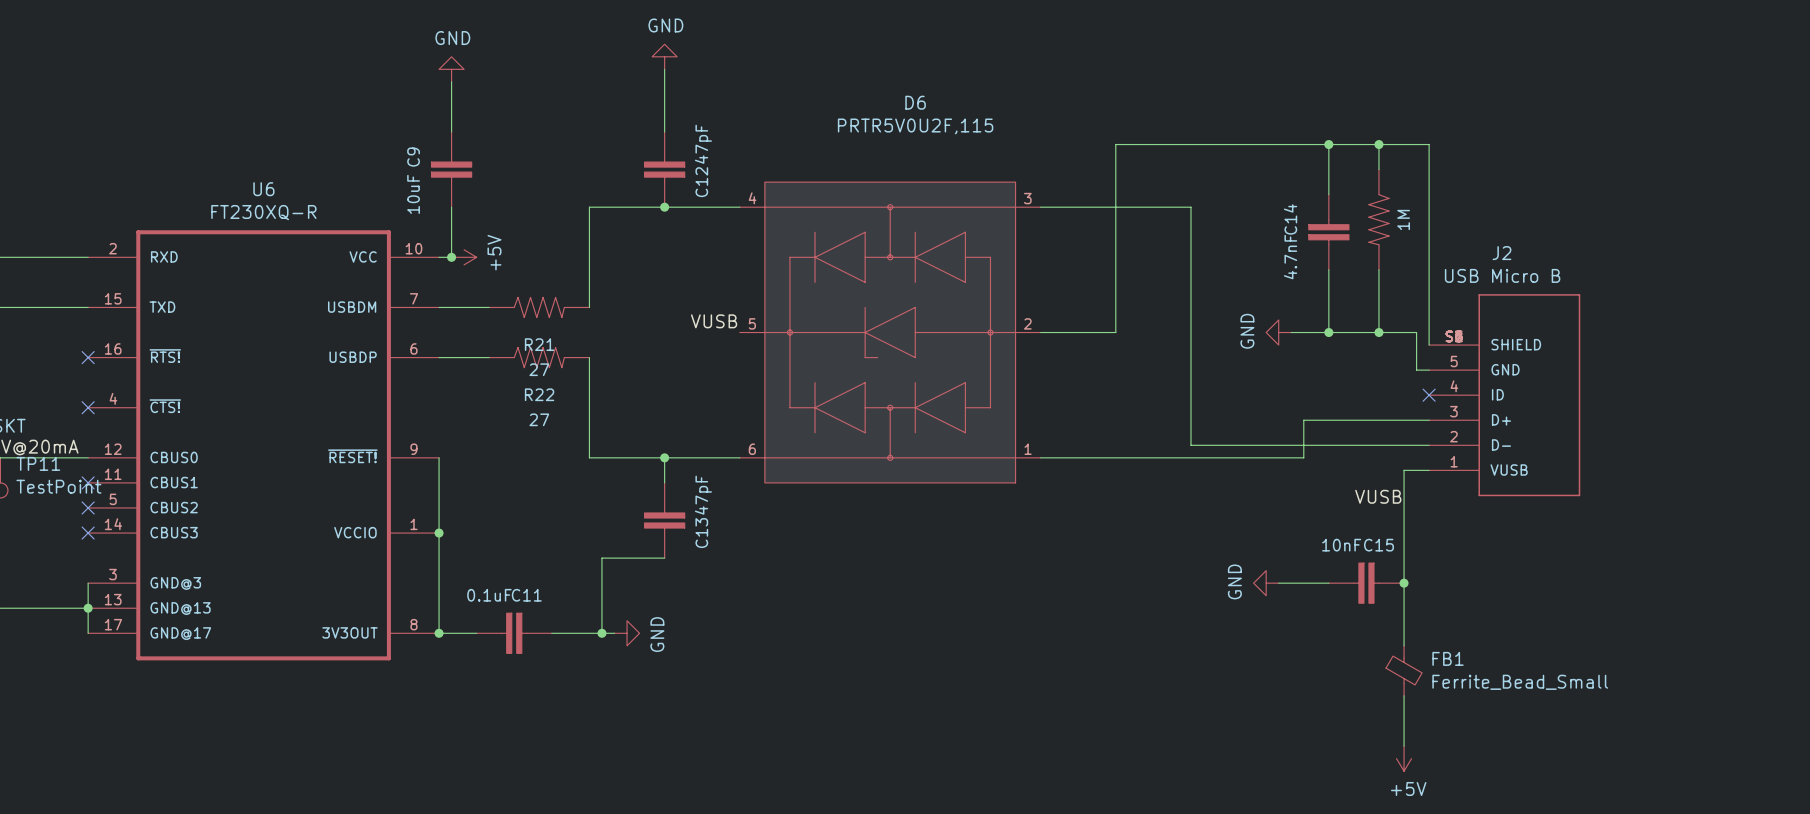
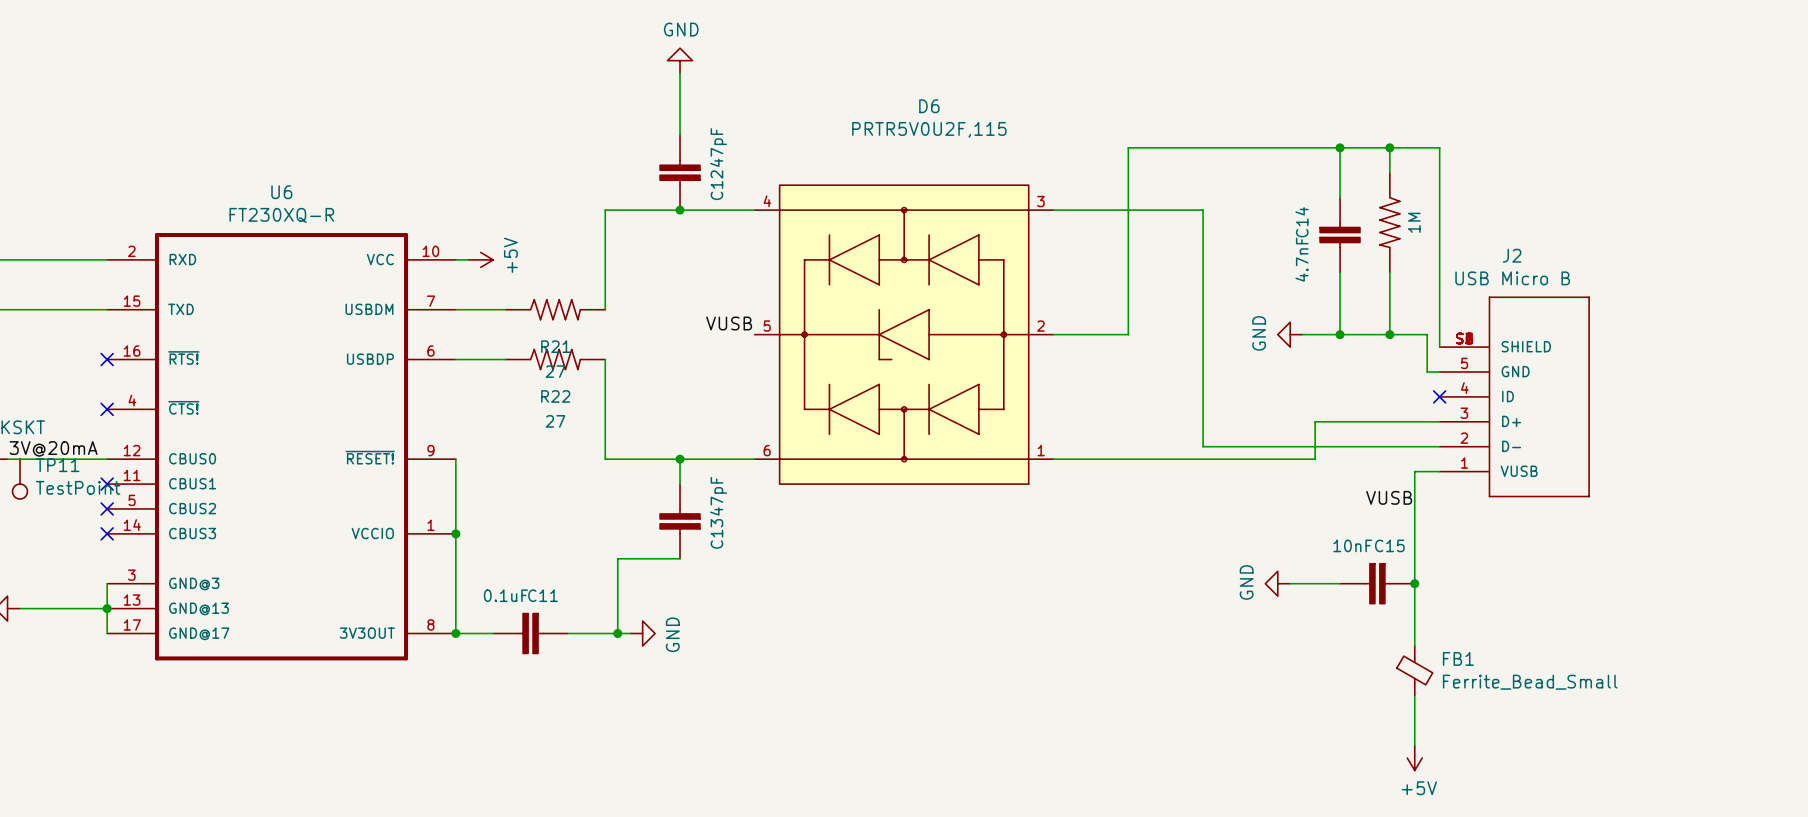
power symbol: GND (451, 69) -> none
wire: (451, 81) (451, 132) -> none
C9: 10uF (451, 169) -> none
wire: (451, 207) (451, 257) -> none
junction: (451, 257) -> none

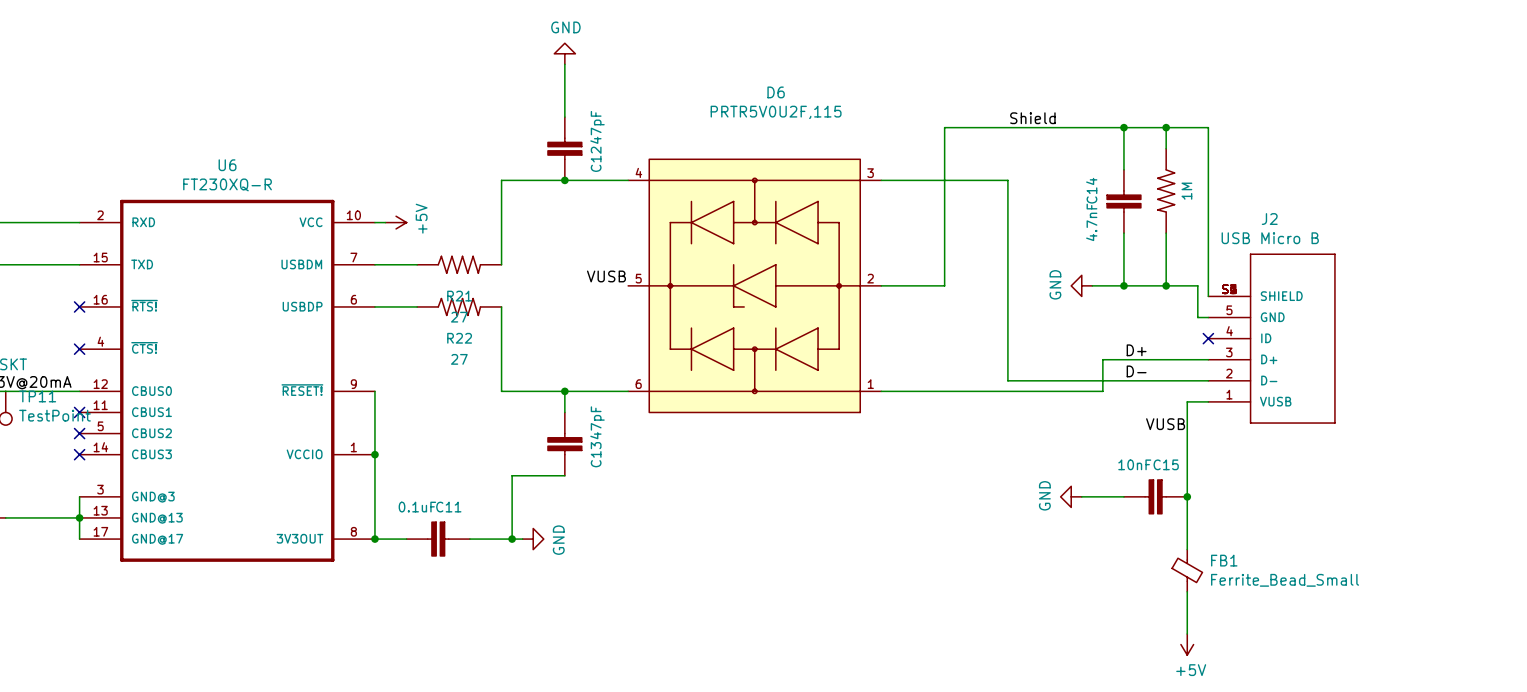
label: none -> Shield (1032, 118)
label: none -> D+ (1136, 350)
label: none -> D- (1136, 371)

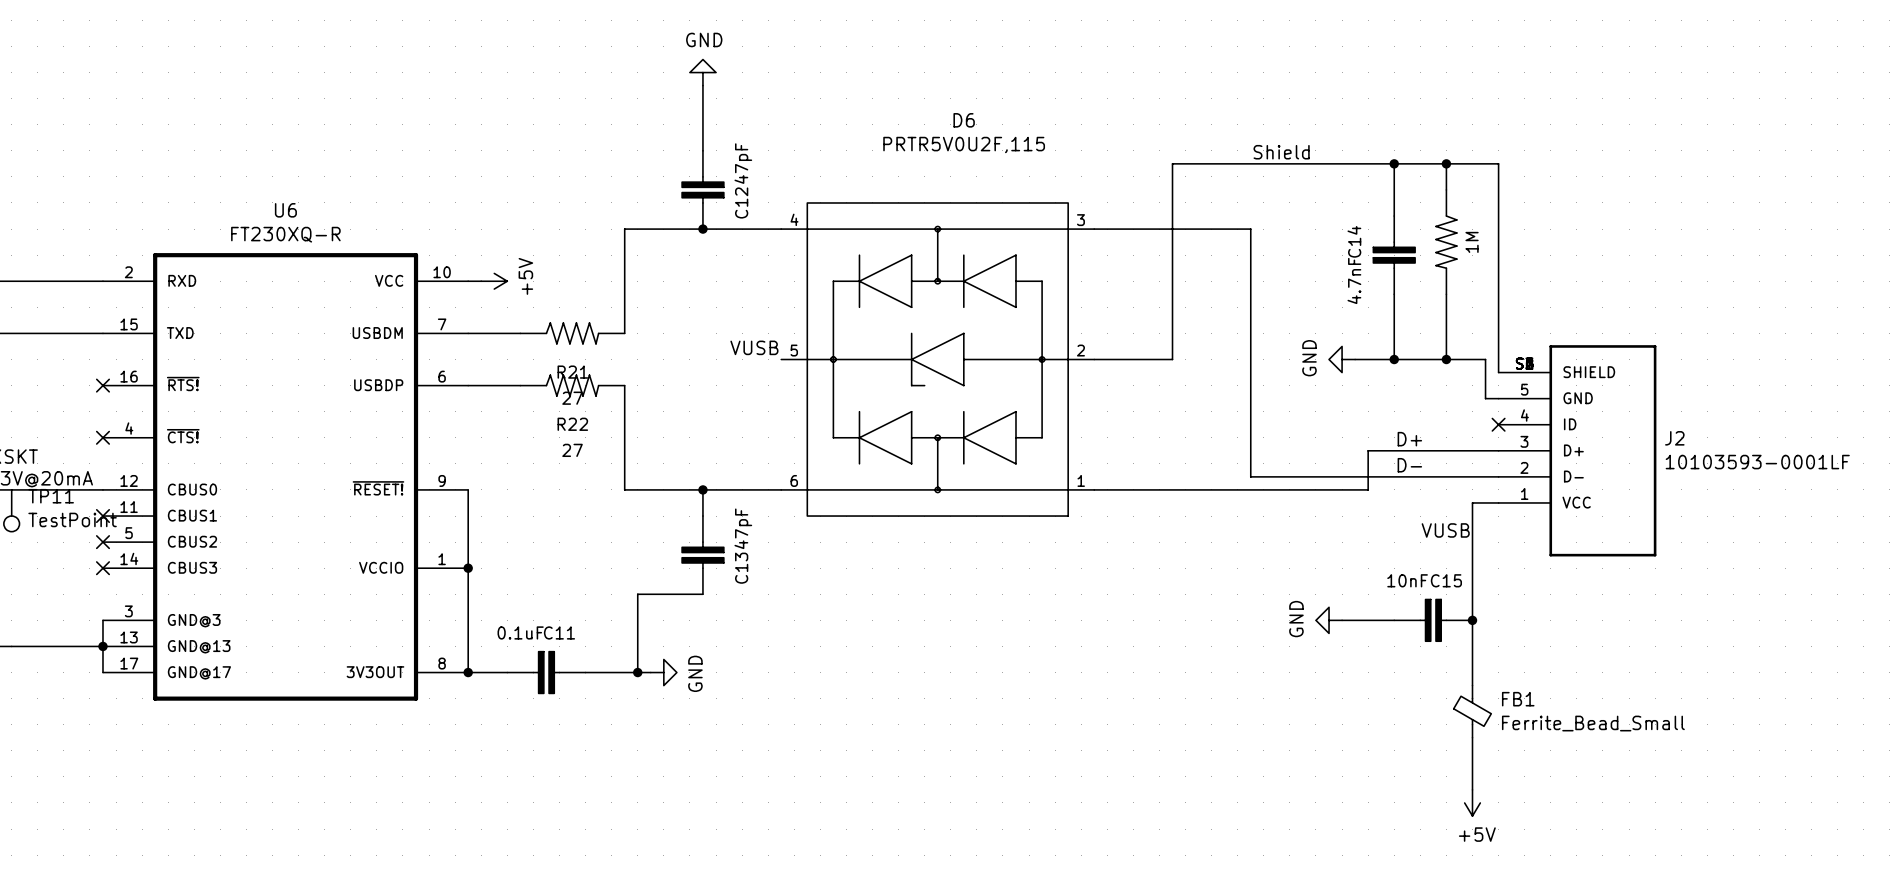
J2 name position: J2 (1269, 219) -> J2 (1674, 438)
J2 value: USB Micro B (1270, 238) -> 10103593-0001LF (1757, 462)
J2 symbol: [1208, 253, 1336, 424] -> [1498, 345, 1657, 557]

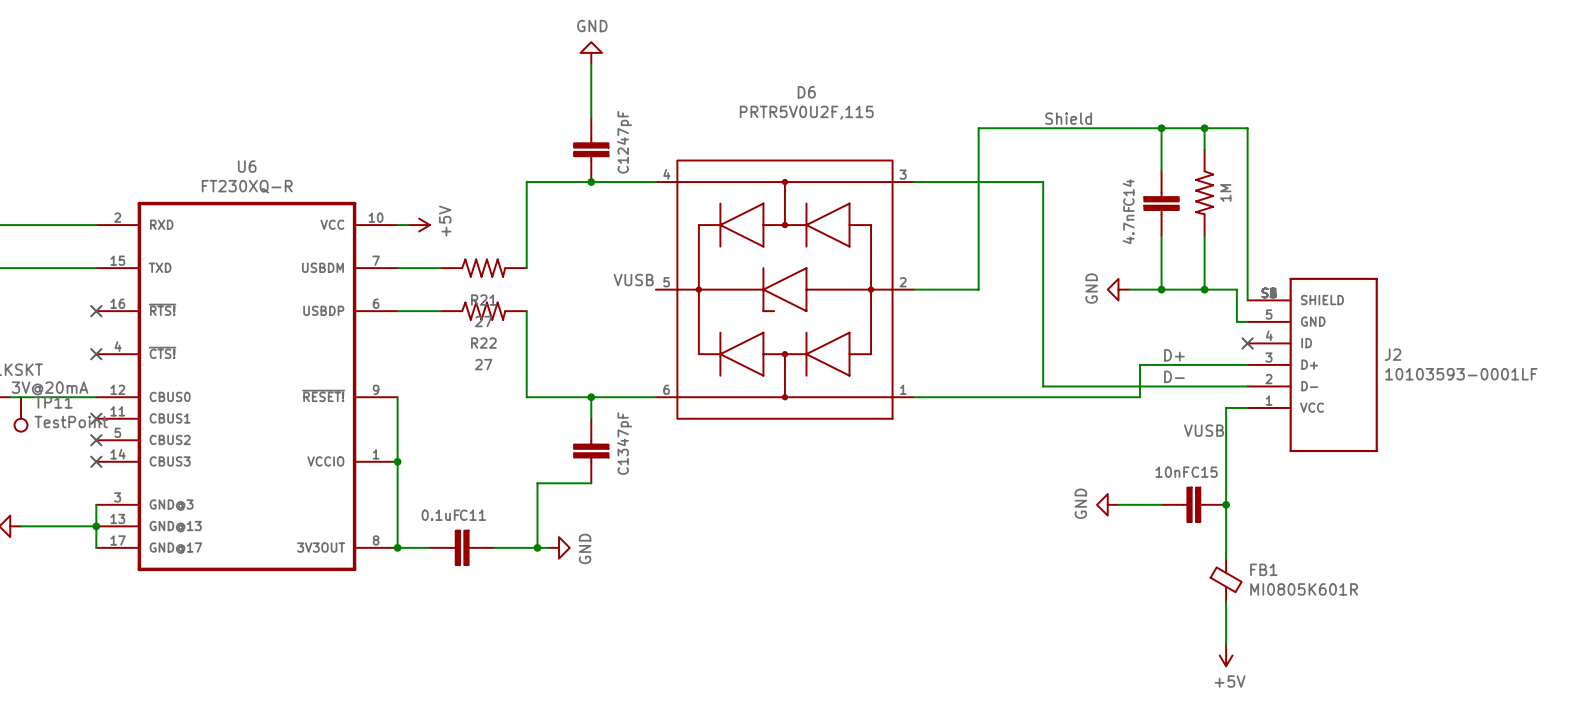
FB1 value: Ferrite_Bead_Small (1593, 723) -> MI0805K601R (1304, 589)

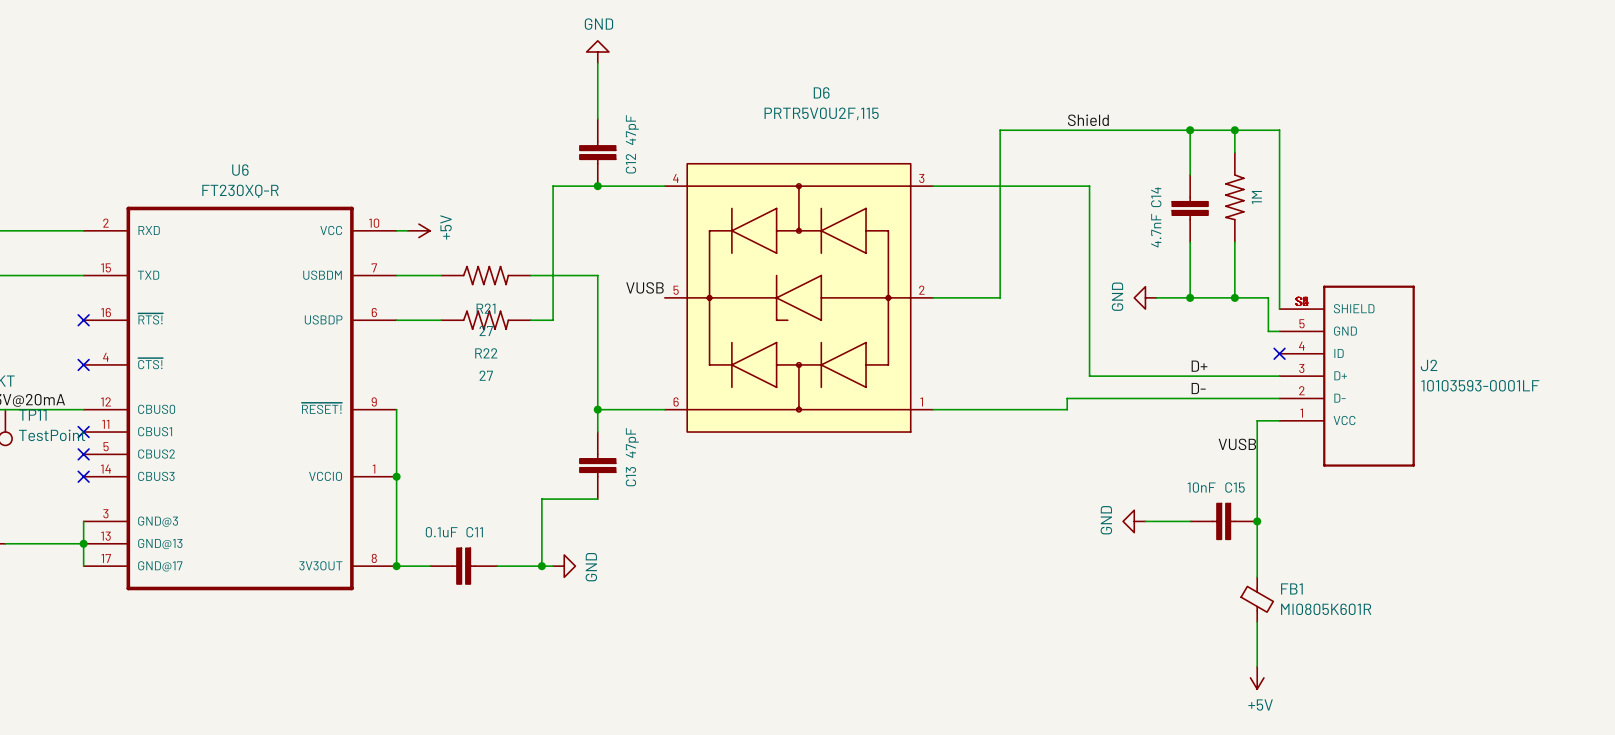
wire: (548, 182) (526, 182) (526, 268) -> (553, 186) (553, 320) (530, 320)
wire: (1043, 182) (1043, 386) -> (1067, 186) (1089, 186) (1089, 376) (1167, 376)
wire: (526, 311) (526, 397) (591, 397) -> (530, 275) (597, 275) (597, 409)
wire: (1140, 364) (1140, 397) (1043, 397) -> (1067, 398) (1067, 409)

